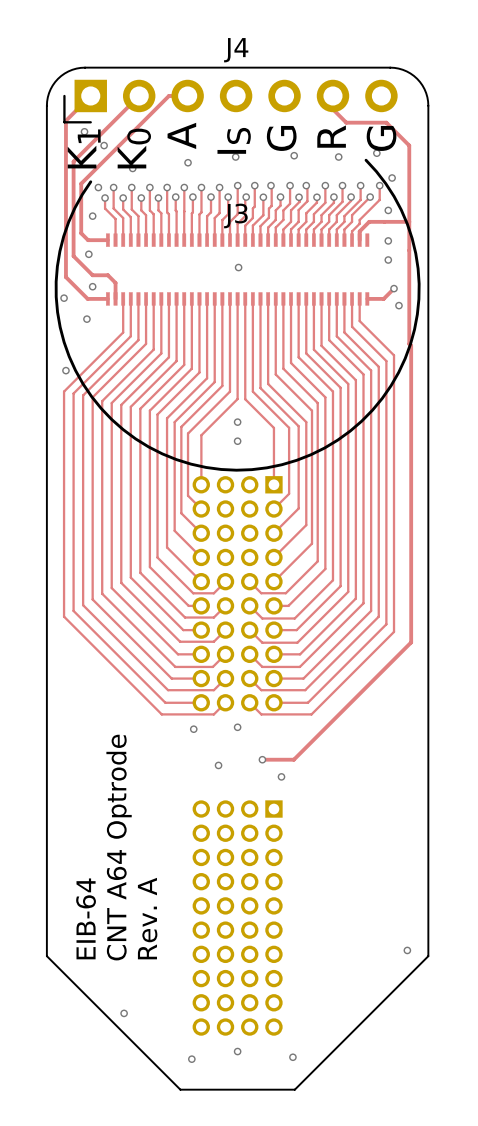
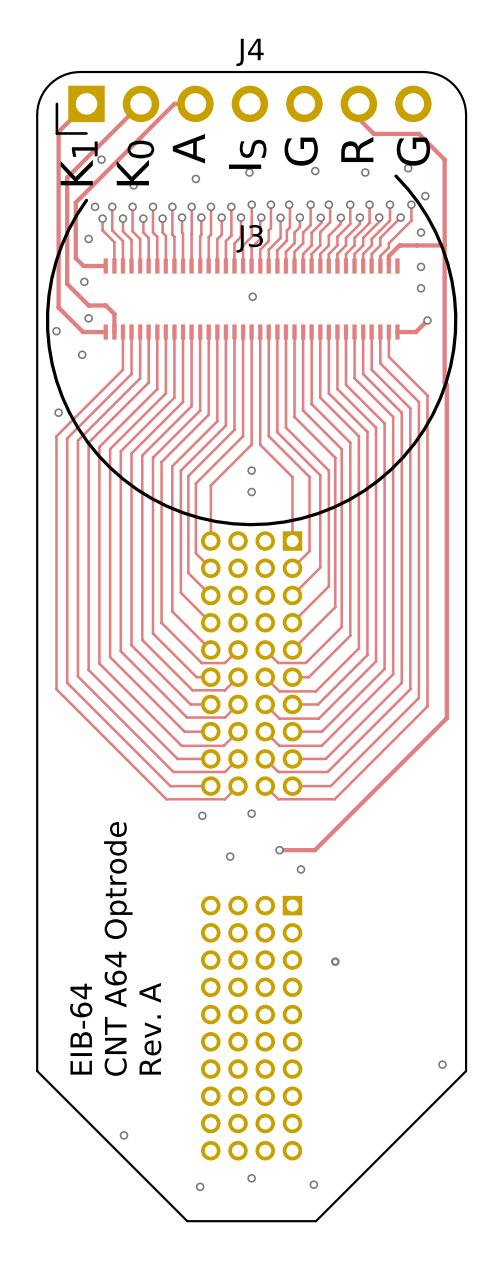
via: (84, 131) -> none
via: (398, 305) -> none
via: none -> (335, 961)

